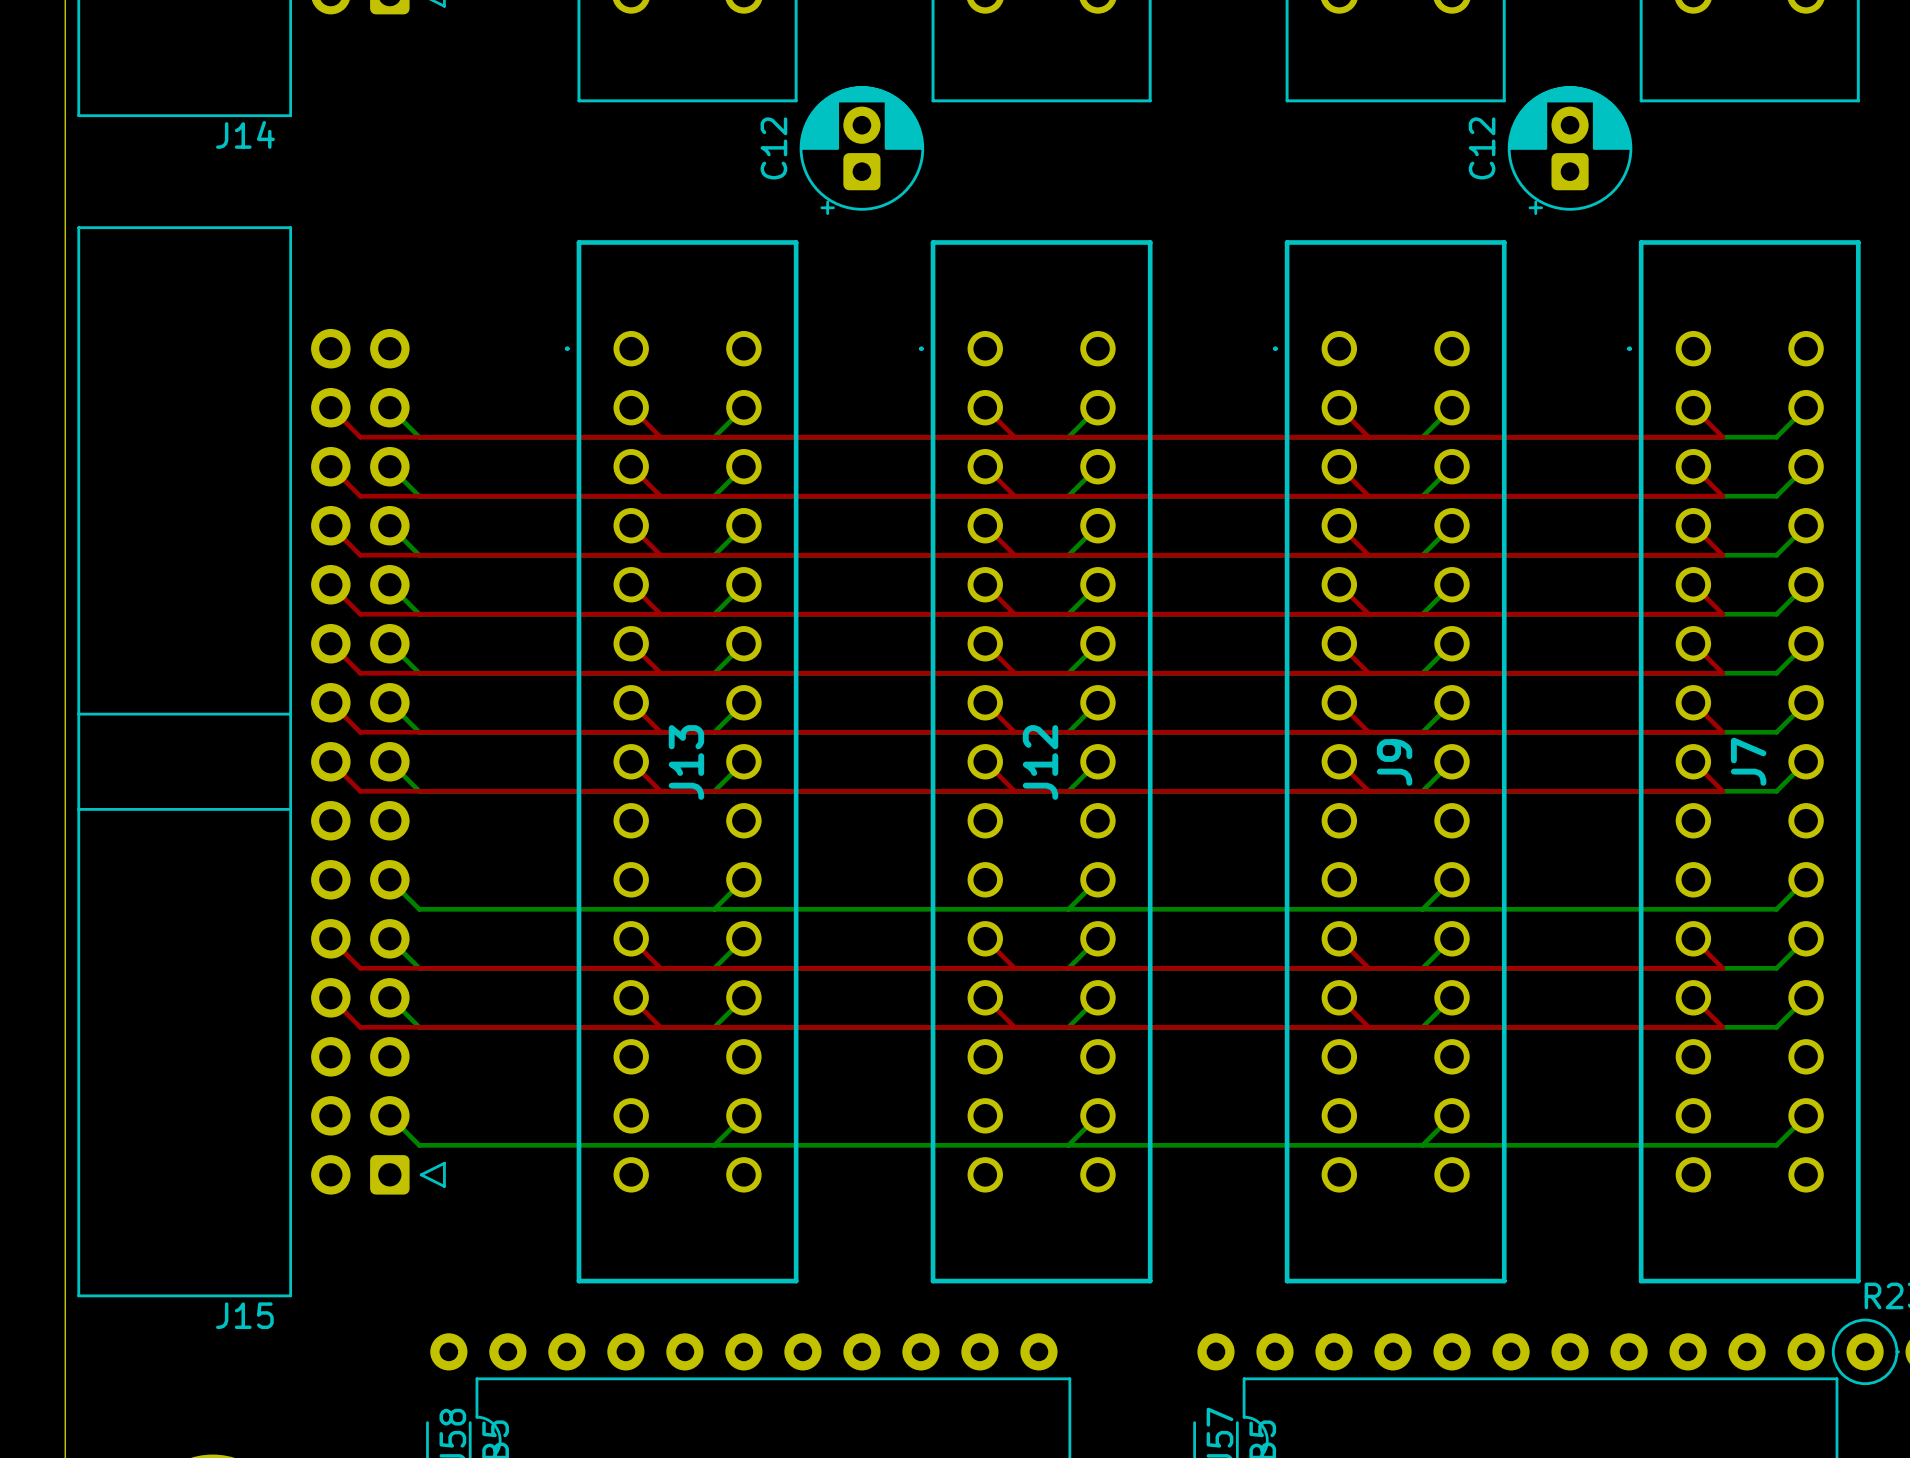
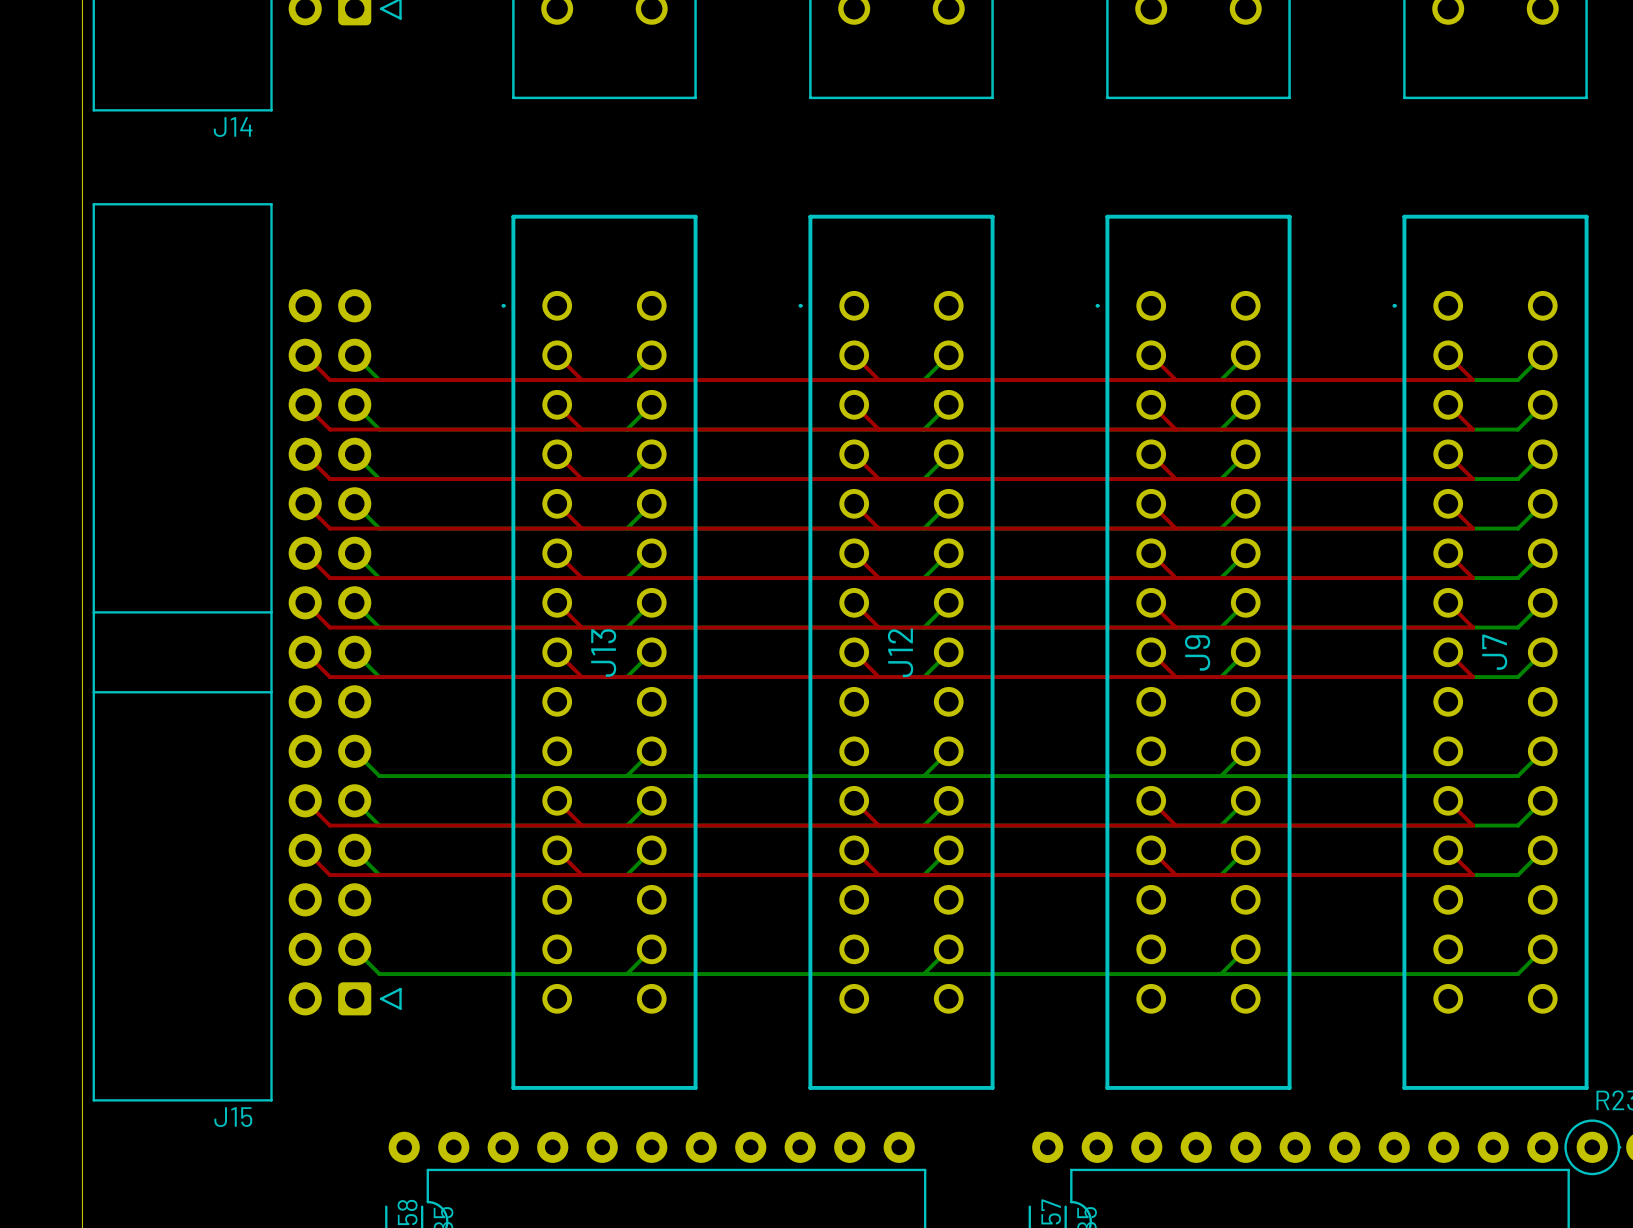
C12: (861, 150) -> none
C12: (1570, 150) -> none

